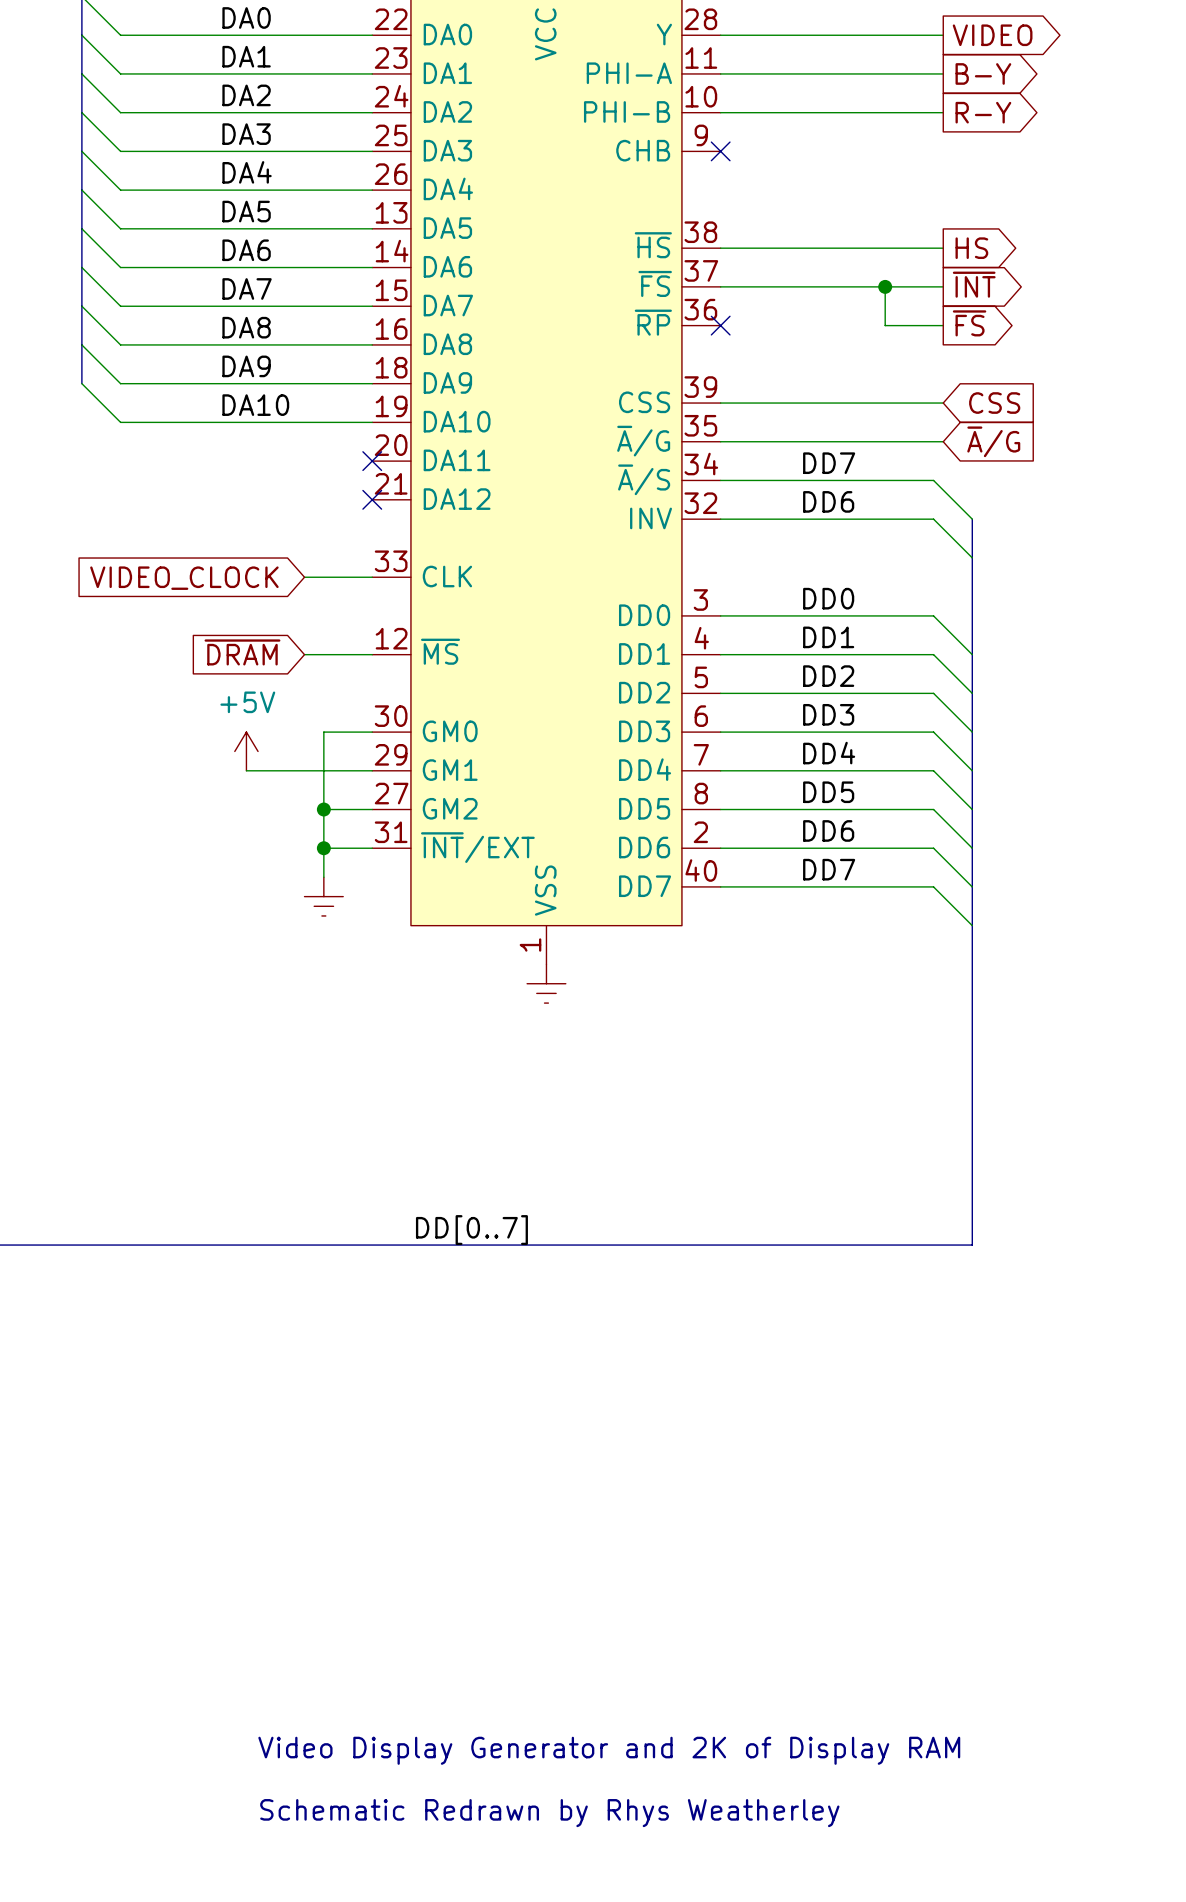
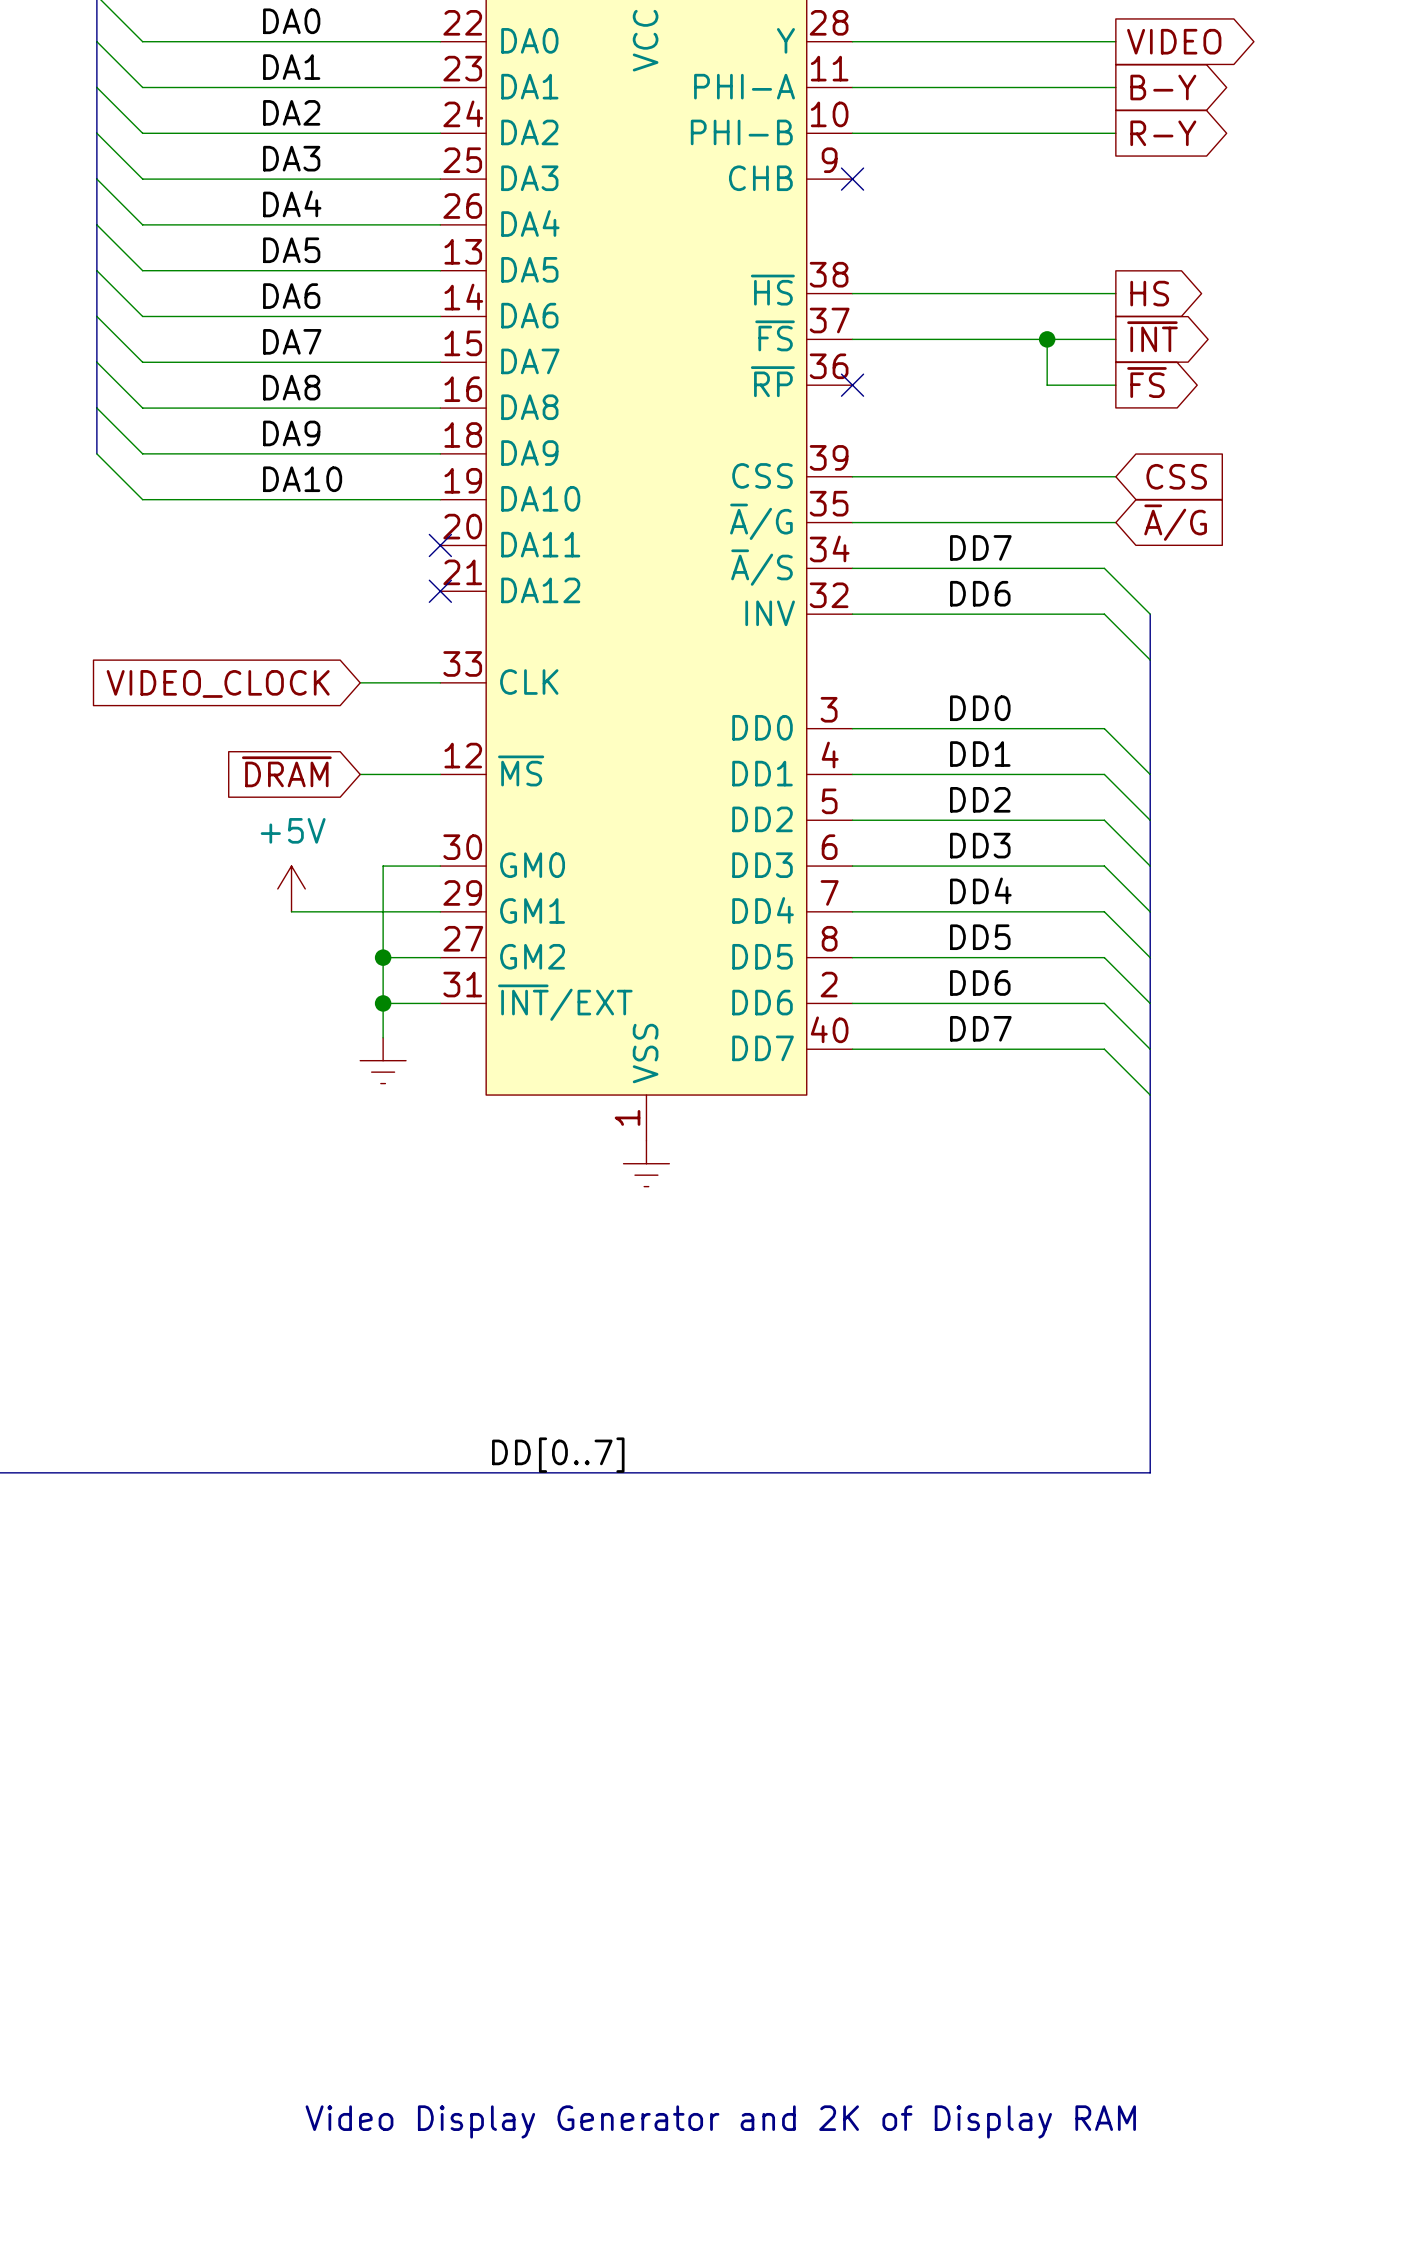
text position: Video Display Generator and 2K of Display RAM (609, 1750) -> Video Display Generator and 2K of Display RAM (720, 2121)
text: Schematic Redrawn by Rhys Weatherley (549, 1813) -> none

